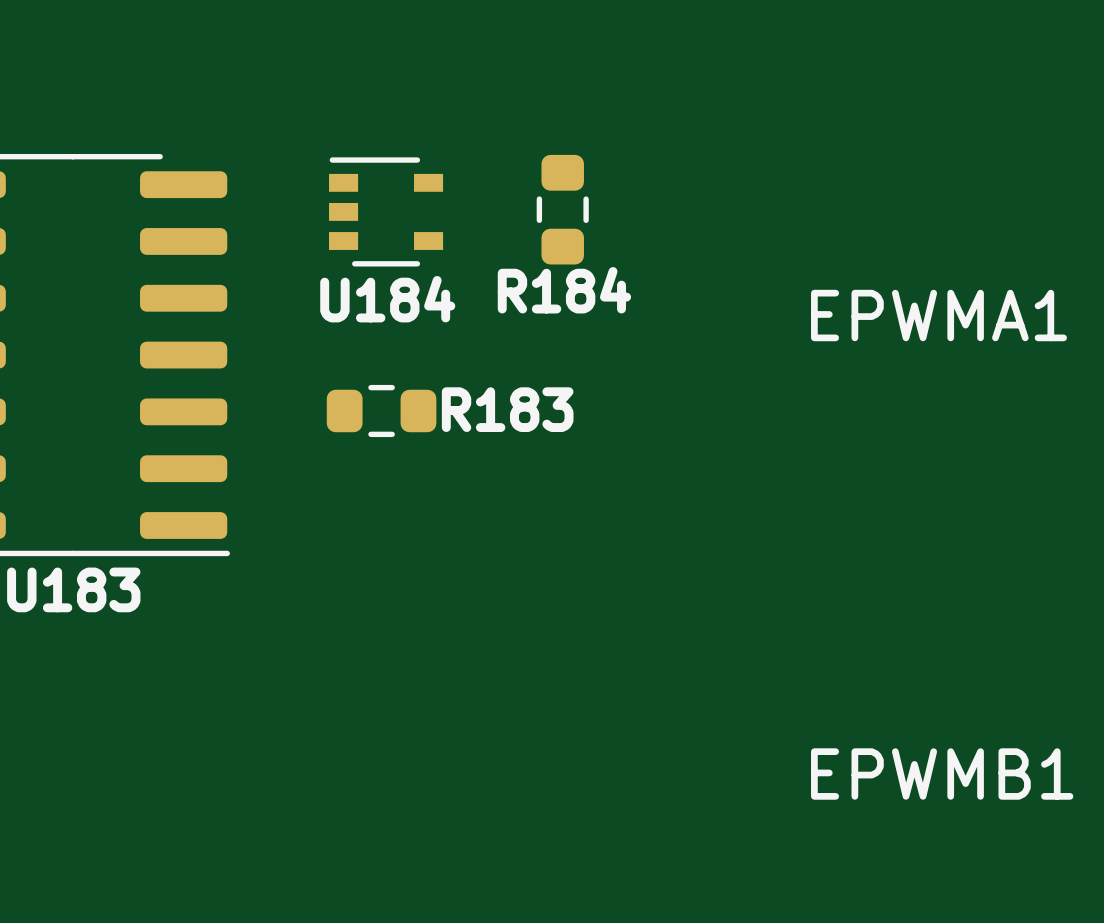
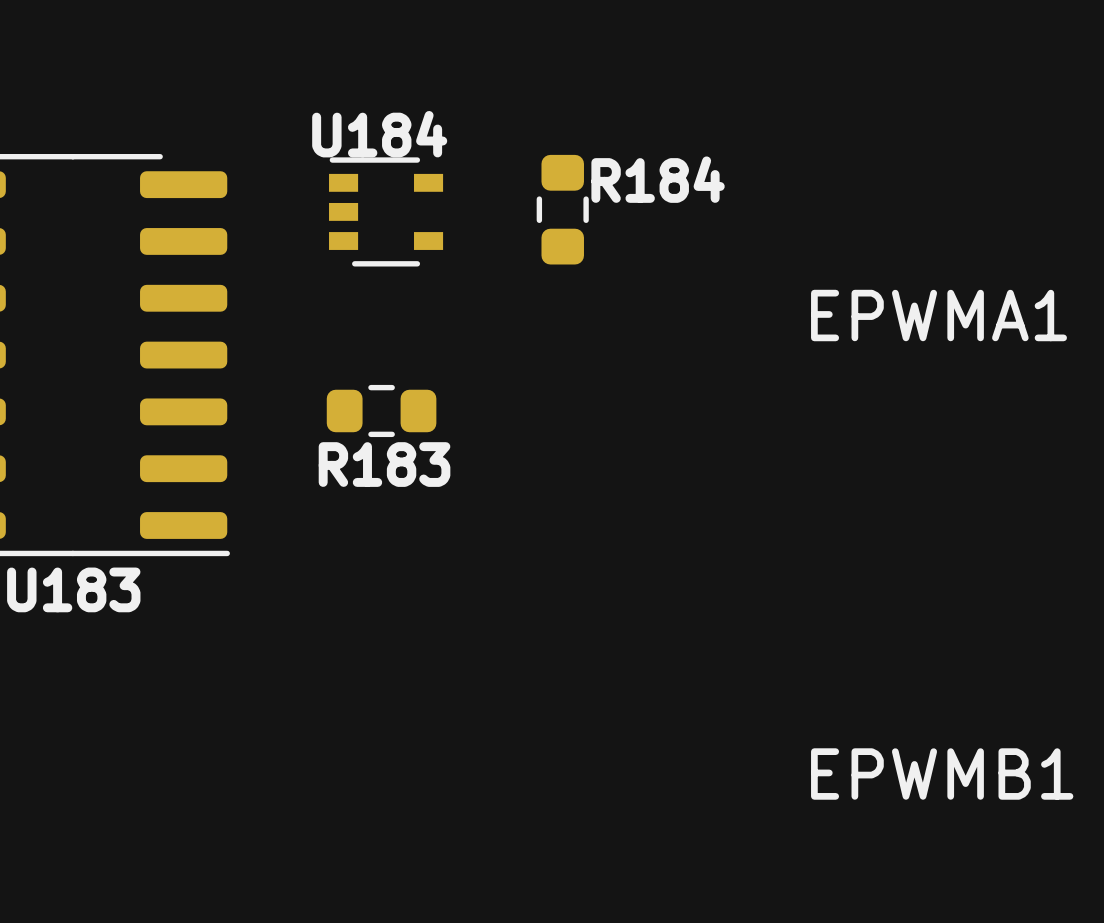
R184 name position: R184 (564, 290) -> R184 (658, 179)
U184 name position: U184 (387, 299) -> U184 (379, 134)
R183 name position: R183 (507, 409) -> R183 (384, 464)

